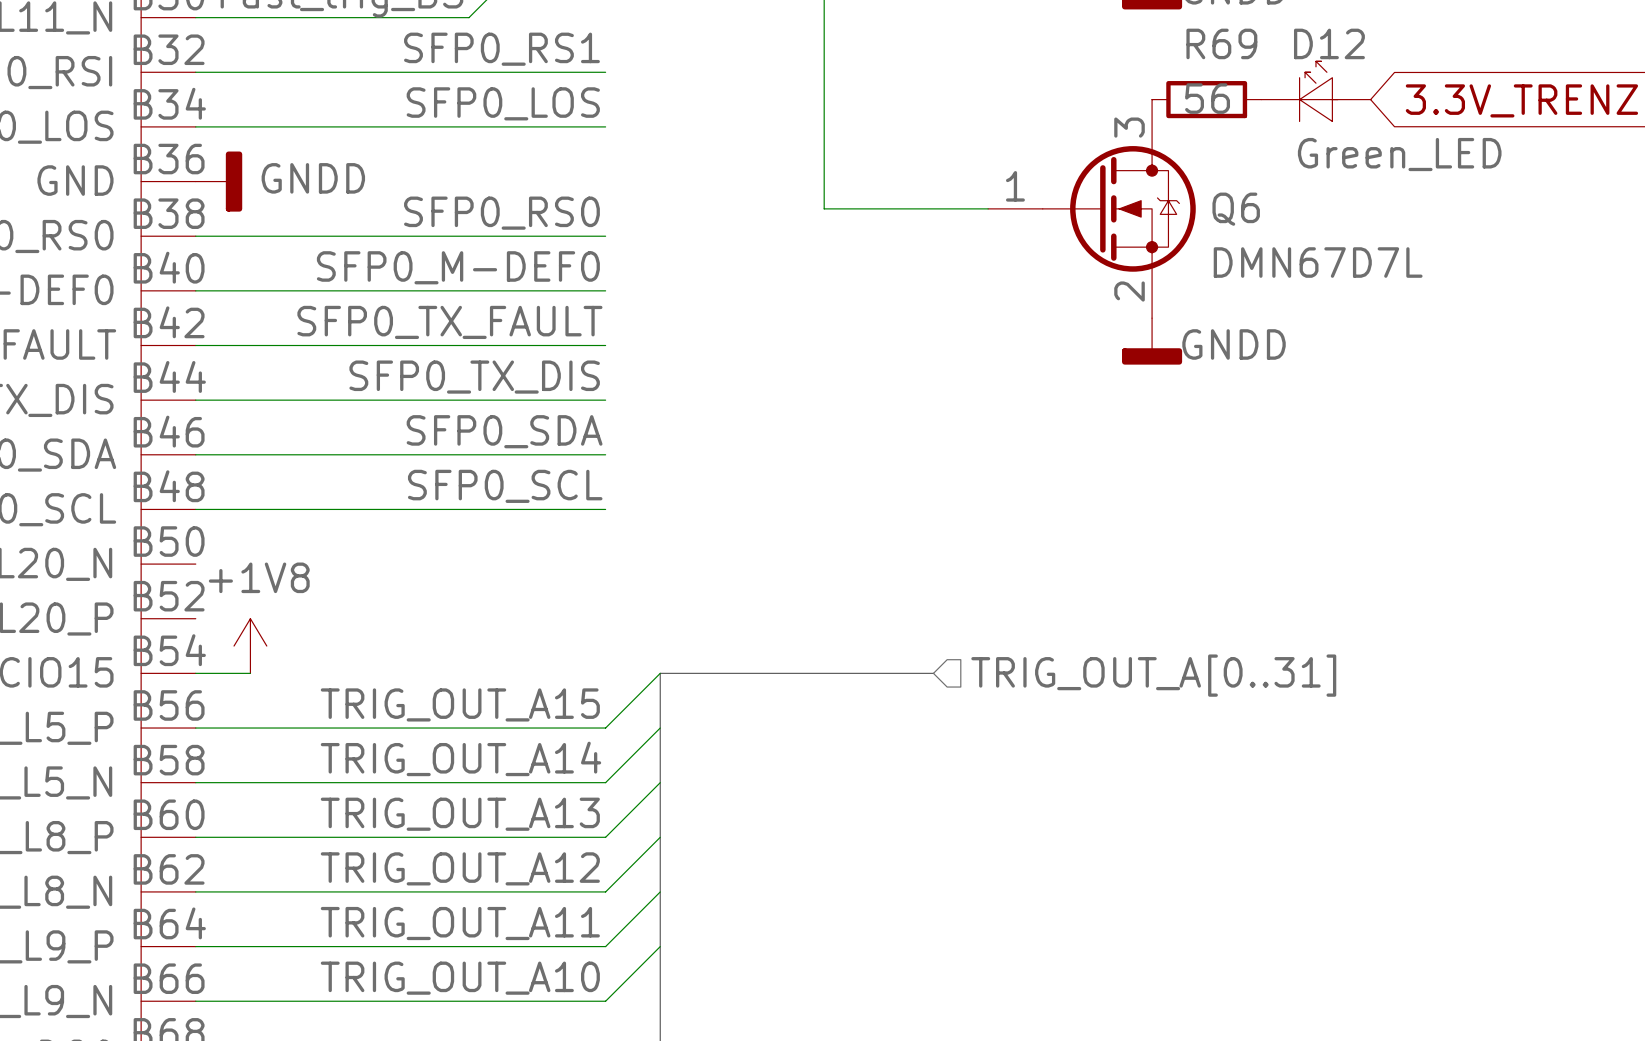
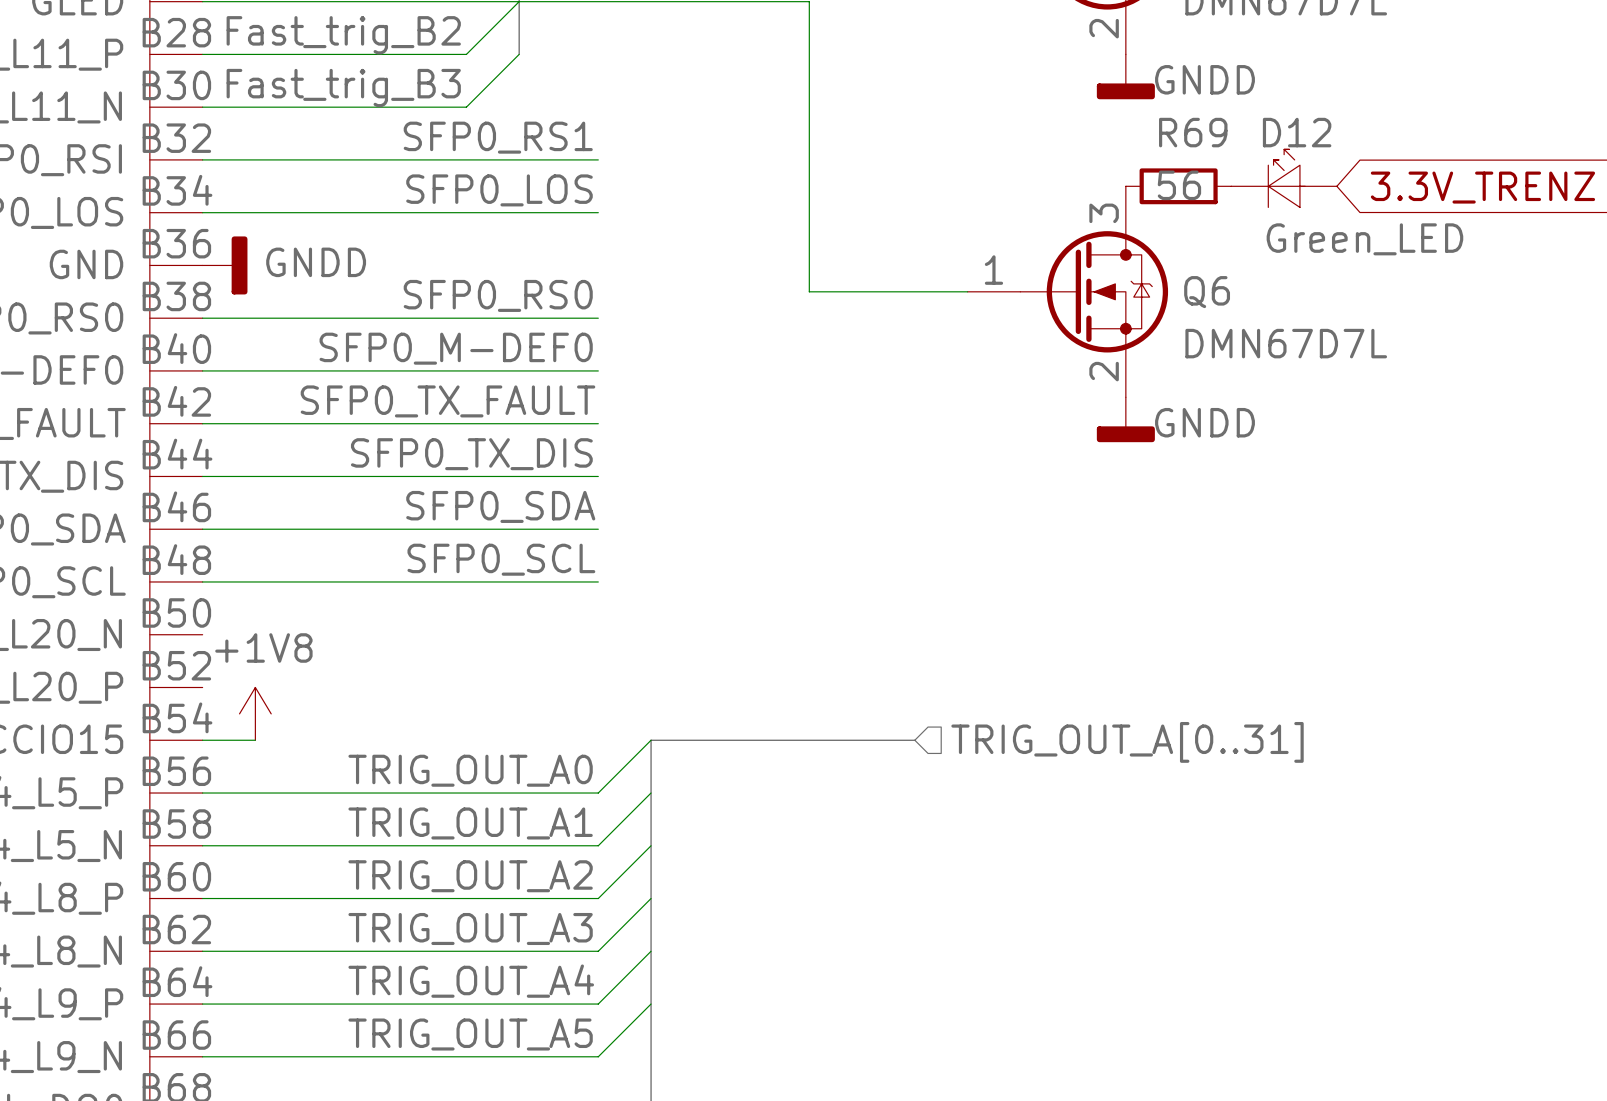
label: TRIG_OUT_A15 (460, 704) -> TRIG_OUT_A0 (470, 770)
label: TRIG_OUT_A14 (460, 758) -> TRIG_OUT_A1 (470, 823)
label: TRIG_OUT_A13 (460, 814) -> TRIG_OUT_A2 (470, 876)
label: TRIG_OUT_A12 (460, 868) -> TRIG_OUT_A3 (470, 928)
label: TRIG_OUT_A11 (460, 923) -> TRIG_OUT_A4 (471, 981)
label: TRIG_OUT_A10 (460, 978) -> TRIG_OUT_A5 (470, 1034)

